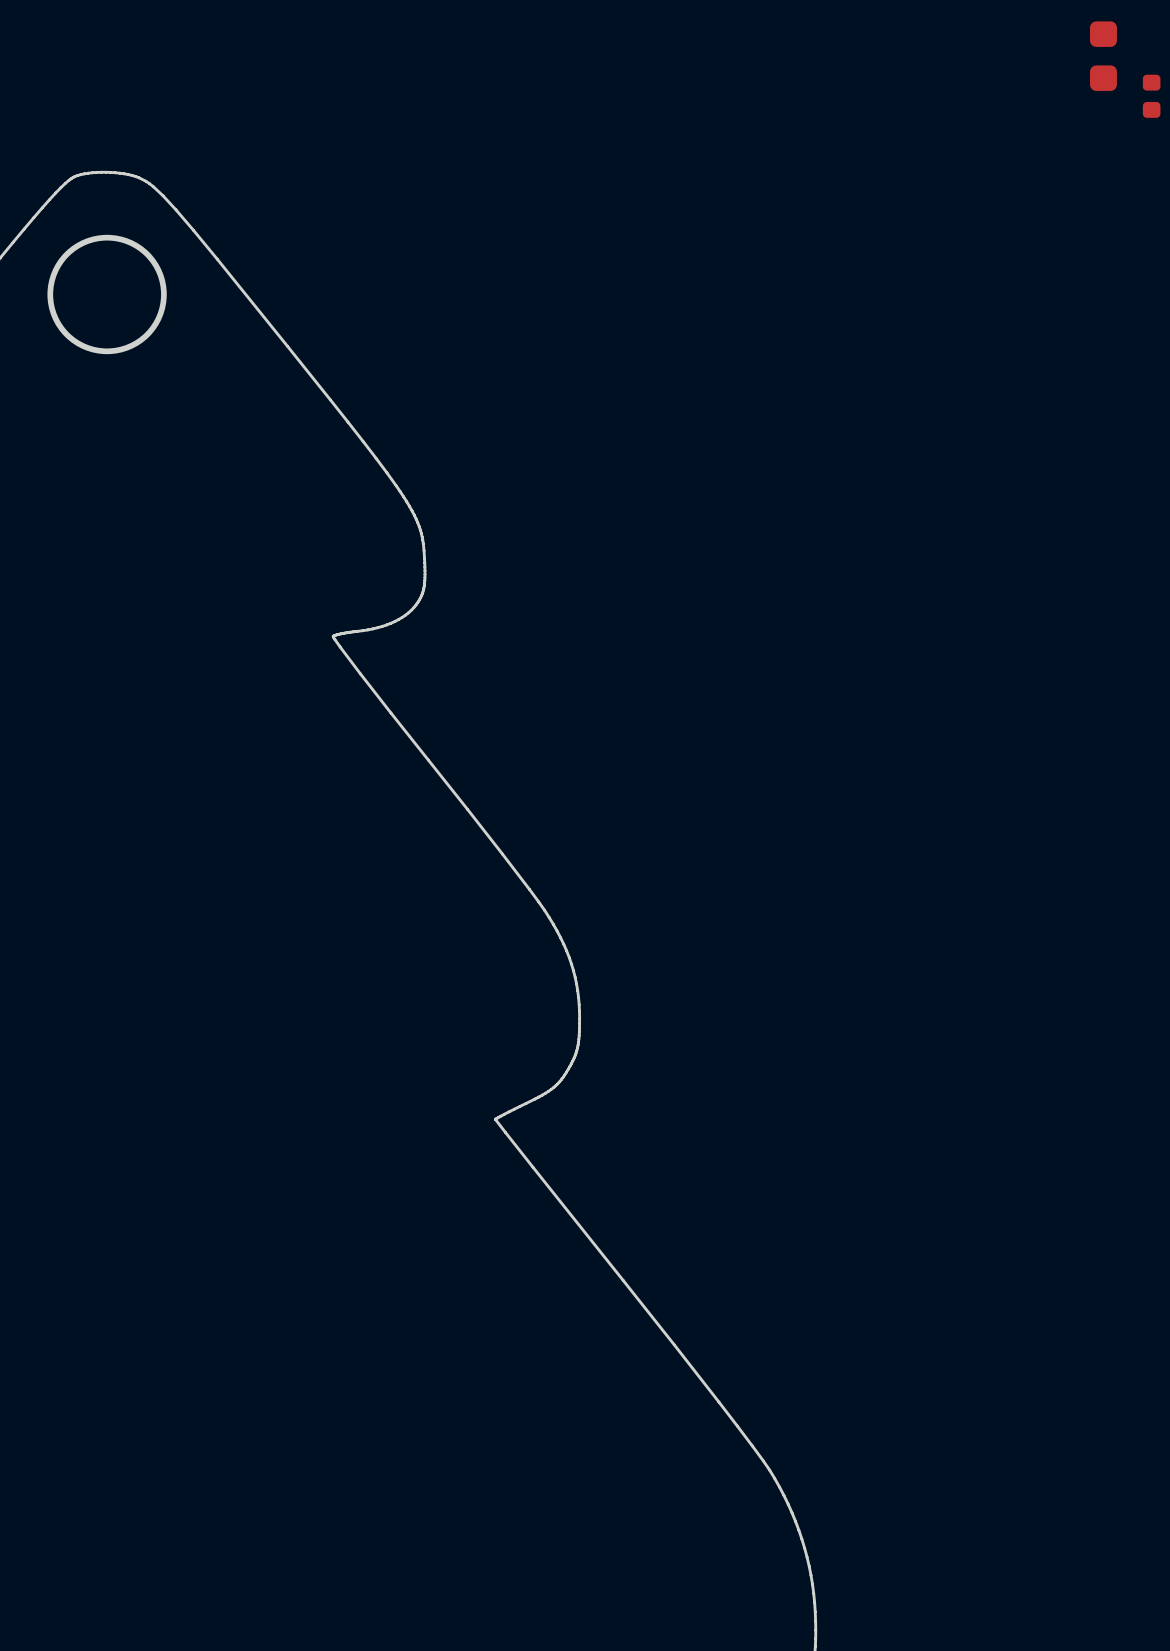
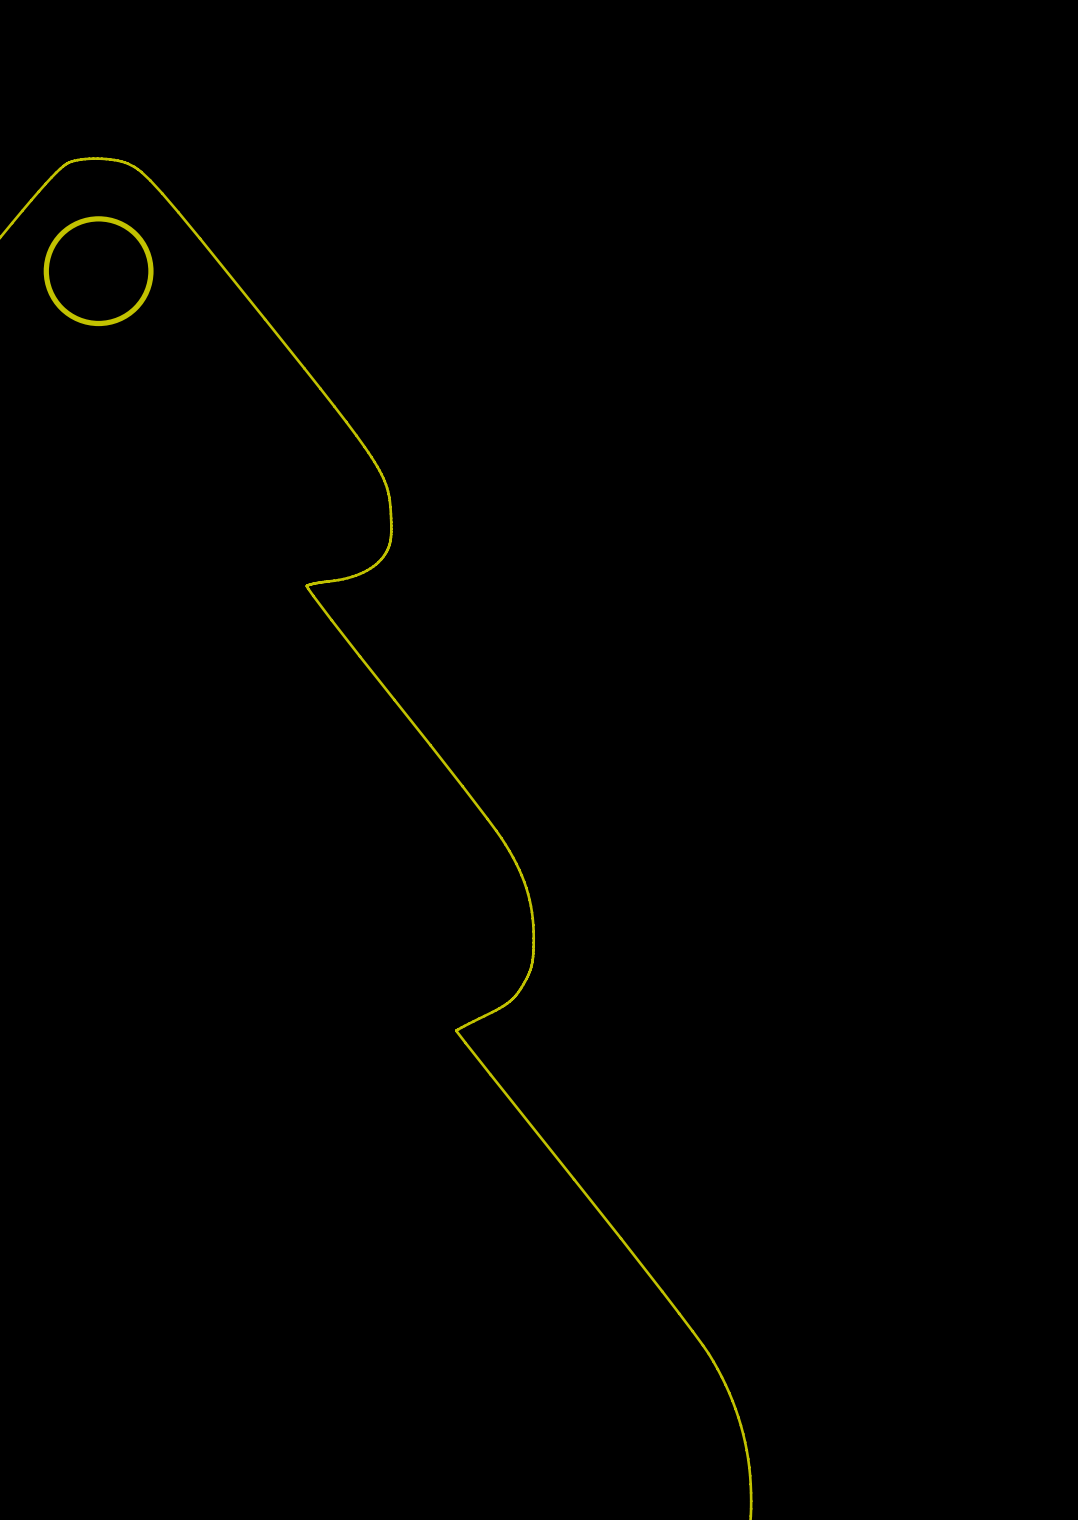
part: (1103, 56) -> none
part: (1151, 96) -> none

